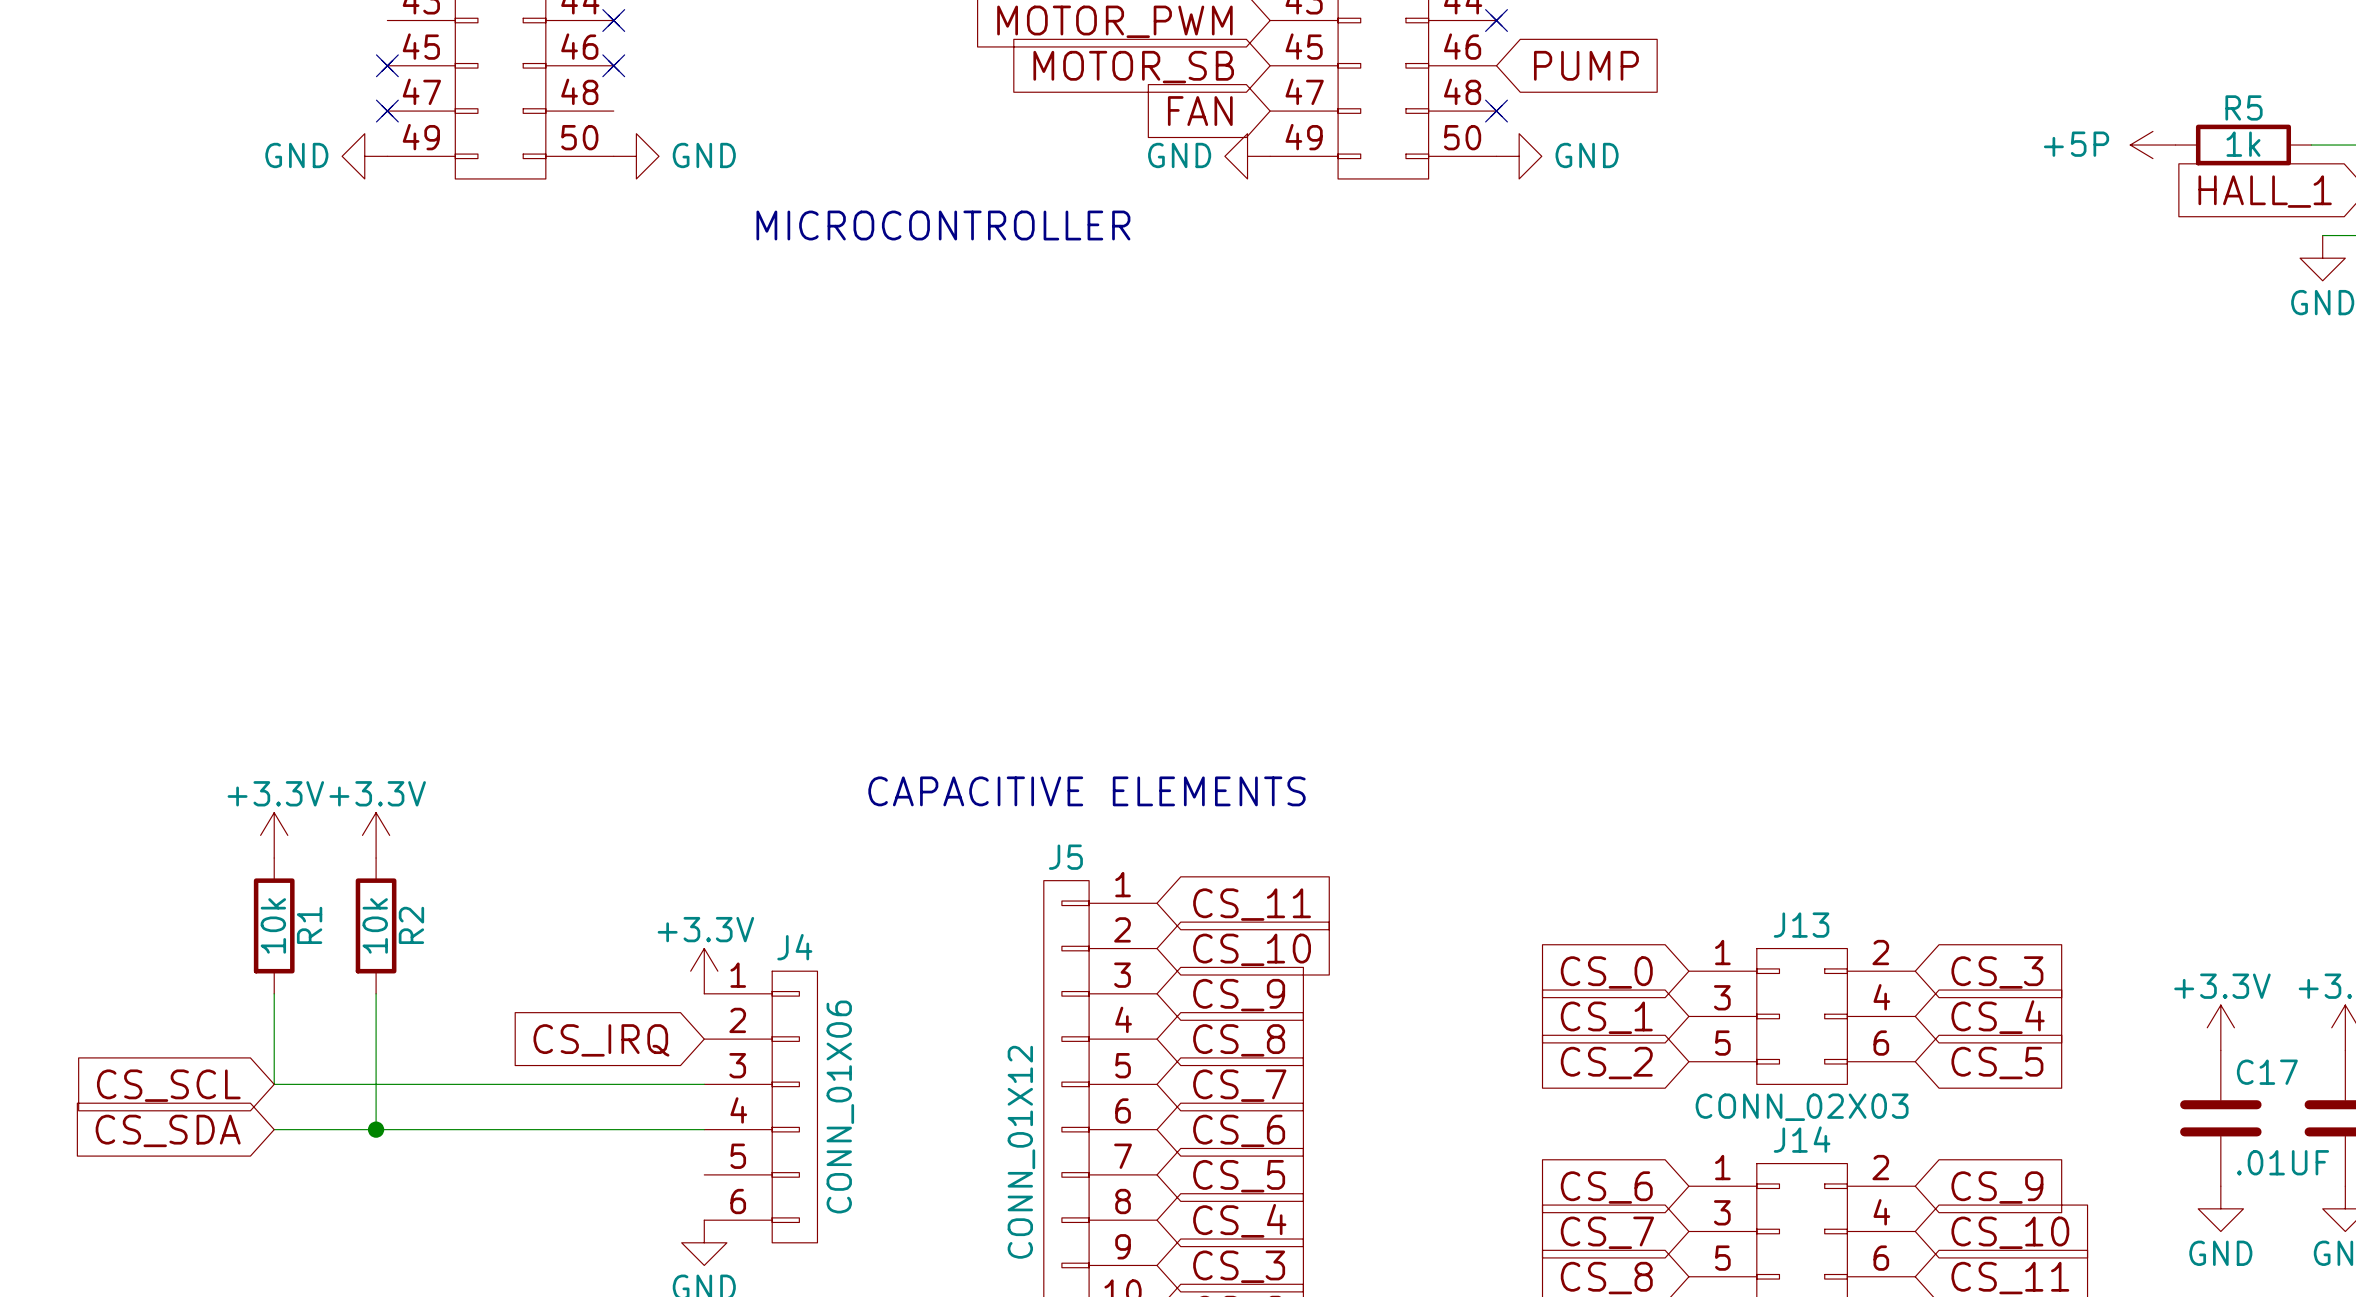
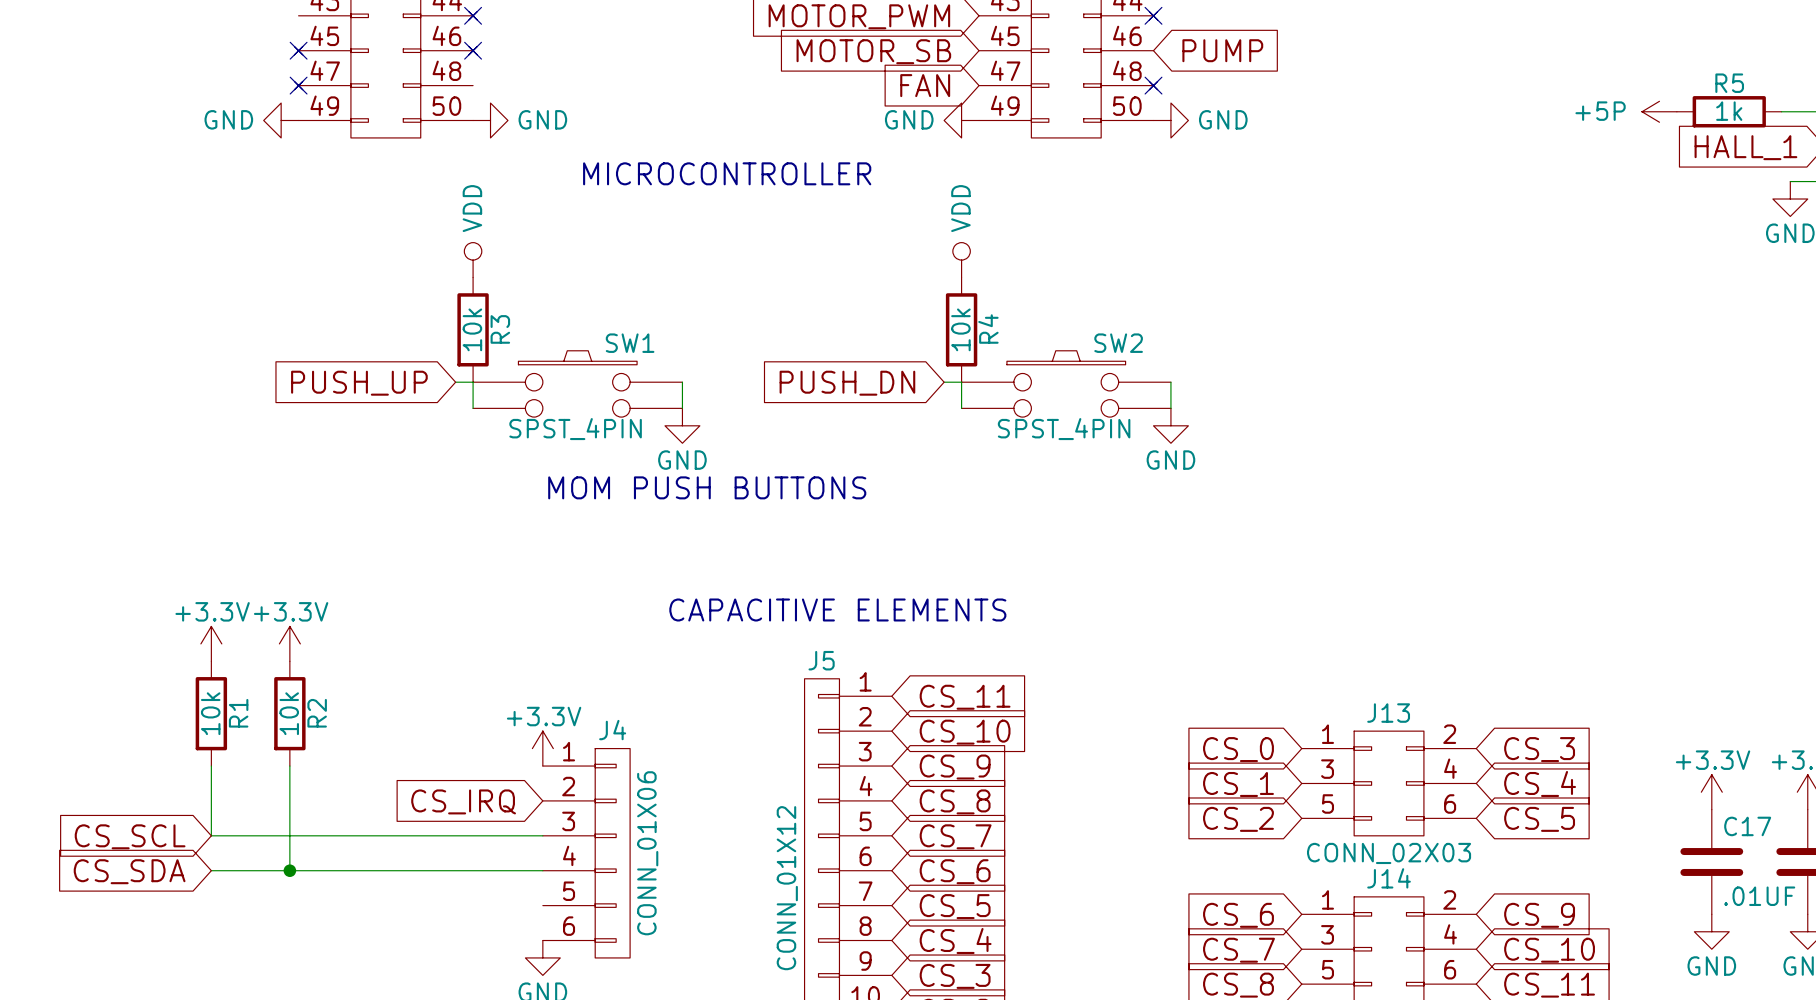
power symbol: none -> VDD (473, 260)
power symbol: none -> VDD (961, 260)
R3: none -> 10k (473, 329)
R4: none -> 10k (961, 329)
wire: none -> (455, 382) (473, 382) (473, 408)
wire: none -> (682, 382) (682, 408)
wire: none -> (944, 382) (961, 382) (961, 408)
wire: none -> (1170, 382) (1170, 408)
global label: none -> PUSH_UP (359, 383)
global label: none -> PUSH_DN (847, 383)
SW1: none -> SPST_4PIN (577, 383)
SW2: none -> SPST_4PIN (1066, 383)
power symbol: none -> GND (682, 425)
power symbol: none -> GND (1170, 425)
text: none -> MOM PUSH BUTTONS (707, 487)

